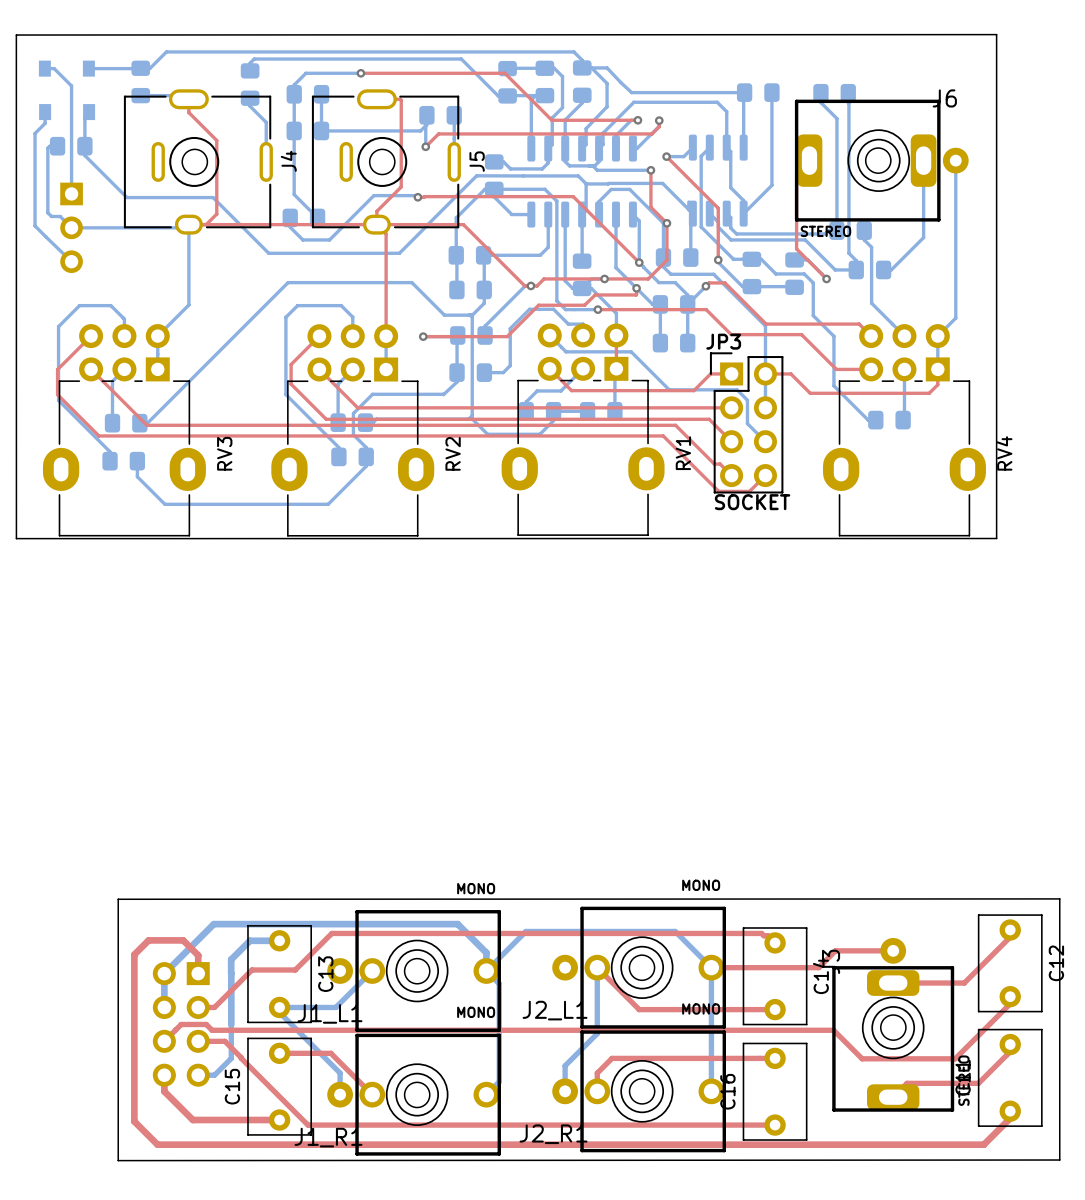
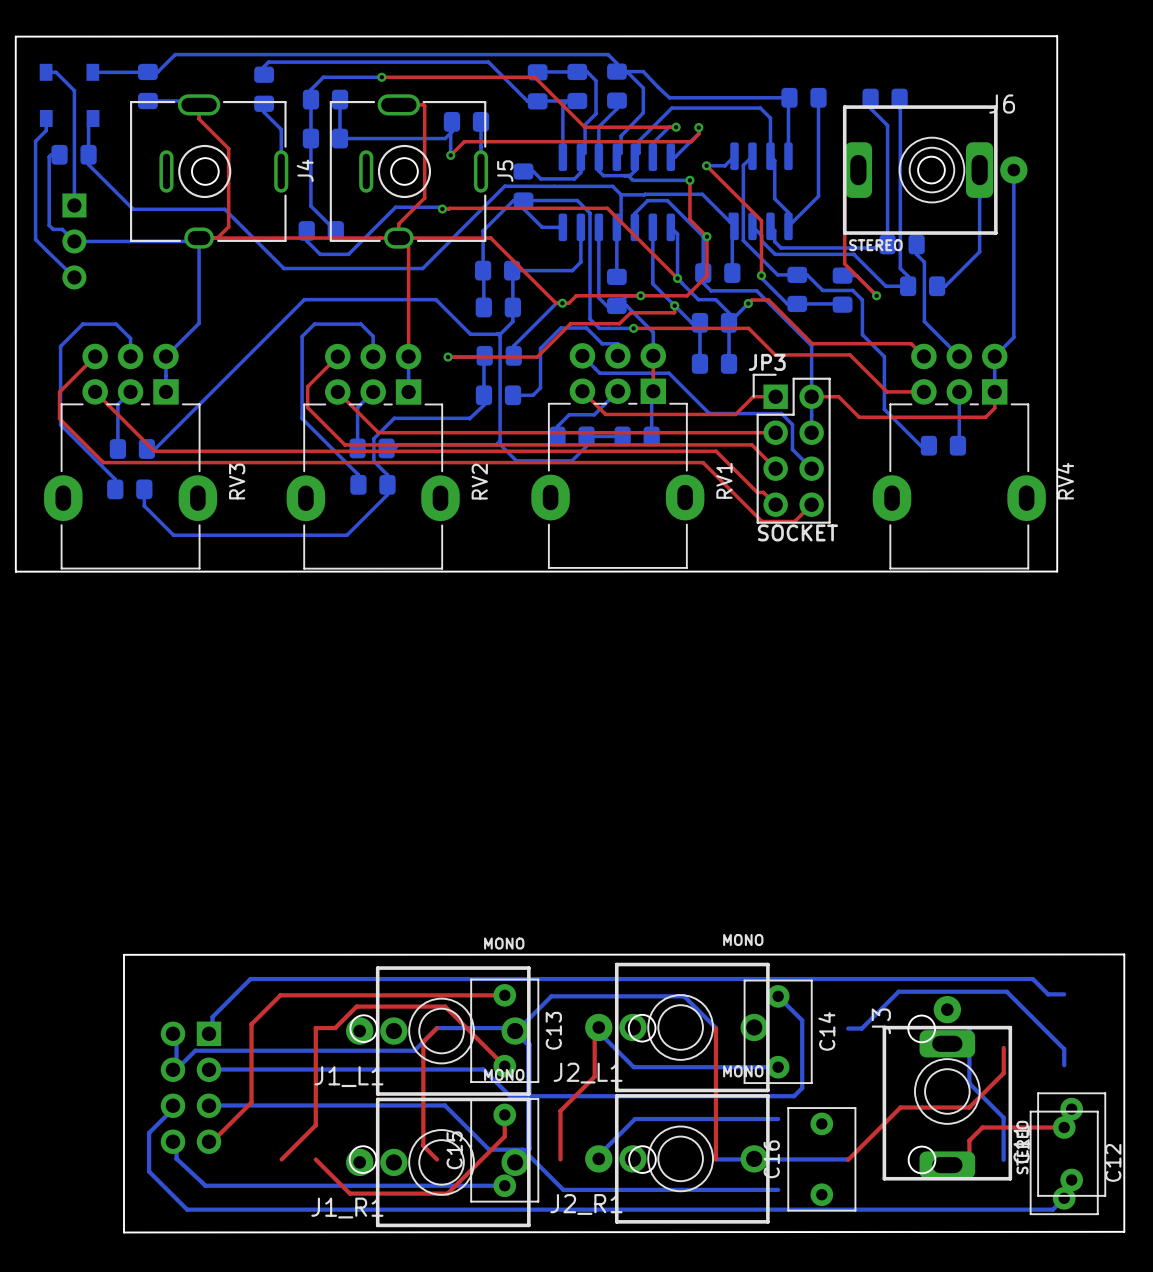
top track: (1017, 929) (964, 983) (893, 983) -> none
bottom track: none -> (1064, 994) (1048, 994) (1032, 979) (250, 979) (212, 1017) (212, 1033)
top track: none -> (504, 995) (280, 995) (251, 1024) (251, 1102) (212, 1141)
bottom track: none -> (778, 996) (802, 1020) (802, 1088) (794, 1096) (510, 1096) (483, 1069) (212, 1069)
bottom track: (274, 940) (249, 940) (231, 959) (231, 973) -> none
top track: (775, 942) (767, 935) (761, 933) (331, 933) (295, 970) (251, 970) (214, 1007) (198, 1007) -> none
top track: (893, 950) (835, 950) (818, 967) (711, 967) -> none
round board edge: none -> [350, 1014, 378, 1043]
round board edge: none -> [907, 1015, 936, 1043]
round board edge: [404, 958, 431, 985] -> none
C12 position: (1010, 963) -> (1064, 1162)
bottom track: (597, 967) (597, 1033) (565, 1065) (565, 1091) -> none
top track: (597, 967) (639, 1009) (775, 1009) -> none
round board edge position: (642, 967) -> (642, 1028)
top track: none -> (437, 1028) (423, 1041) (423, 1145) (437, 1159)
bottom track: none -> (594, 1028) (633, 1067) (778, 1067)
top track: none -> (594, 1028) (594, 1076) (560, 1110) (560, 1159)
bottom track: none -> (715, 1028) (684, 996) (551, 996) (519, 1028) (437, 1028) (414, 1050) (195, 1050) (176, 1069) (176, 1033)
top track: none -> (715, 1028) (715, 1159)
bottom track: none -> (848, 1028) (861, 1028) (898, 991) (1006, 991) (1064, 1049) (1064, 1065)
bottom track: none -> (969, 1028) (969, 1083) (1003, 1117) (1003, 1159)
bottom track: (372, 971) (335, 1007) (274, 1007) (340, 1073) (340, 1094) -> none
top track: (198, 973) (198, 955) (183, 940) (148, 940) (134, 954) (134, 1121) (157, 1144) (983, 1144) (1017, 1111) -> none
bottom track: (231, 973) (231, 1058) (214, 1075) (198, 1075) -> none
C13 position: (279, 974) -> (504, 1030)
C14 position: (775, 976) -> (778, 1031)
top track: none -> (1003, 1047) (1003, 1073) (969, 1107) (900, 1107) (848, 1159)
top track: (1017, 996) (955, 1058) (862, 1058) (833, 1030) (212, 1030) (206, 1024) (181, 1024) (164, 1041) -> none
top track: none -> (504, 1066) (445, 1006) (356, 1006) (335, 1028) (315, 1028) (315, 1125) (281, 1159)
bottom track: (164, 1007) (164, 973) (213, 924) (457, 924) (486, 952) (486, 971) (525, 931) (675, 931) (711, 967) (711, 1091) -> none
round board edge: [880, 1014, 907, 1041] -> none
bottom track: none -> (176, 1105) (149, 1132) (149, 1171) (187, 1209) (1052, 1209) (1064, 1198)
top track: (198, 1041) (224, 1041) (307, 1125) (775, 1125) -> none
bottom track: none -> (212, 1105) (444, 1105) (489, 1149) (523, 1149) (563, 1189) (778, 1189)
top track: (1017, 1044) (978, 1083) (907, 1083) (893, 1097) -> none
top track: none -> (504, 1114) (504, 1136) (447, 1193) (349, 1193) (315, 1159)
top track: (274, 1053) (330, 1053) (372, 1094) -> none
bottom track: none -> (778, 1119) (635, 1119) (594, 1159)
top track: (775, 1058) (612, 1058) (597, 1073) (597, 1091) -> none
top track: none -> (1064, 1127) (982, 1127) (969, 1140) (969, 1159)
bottom track: none -> (176, 1141) (176, 1158) (205, 1185) (504, 1185)
top track: (164, 1075) (164, 1091) (192, 1120) (274, 1120) -> none
round board edge: none -> [349, 1145, 377, 1174]
round board edge: none -> [908, 1146, 936, 1174]
round board edge: [404, 1082, 431, 1108] -> none
C15 position: (279, 1086) -> (504, 1150)
round board edge position: (642, 1091) -> (642, 1159)
bottom track: none -> (715, 1159) (848, 1159)

